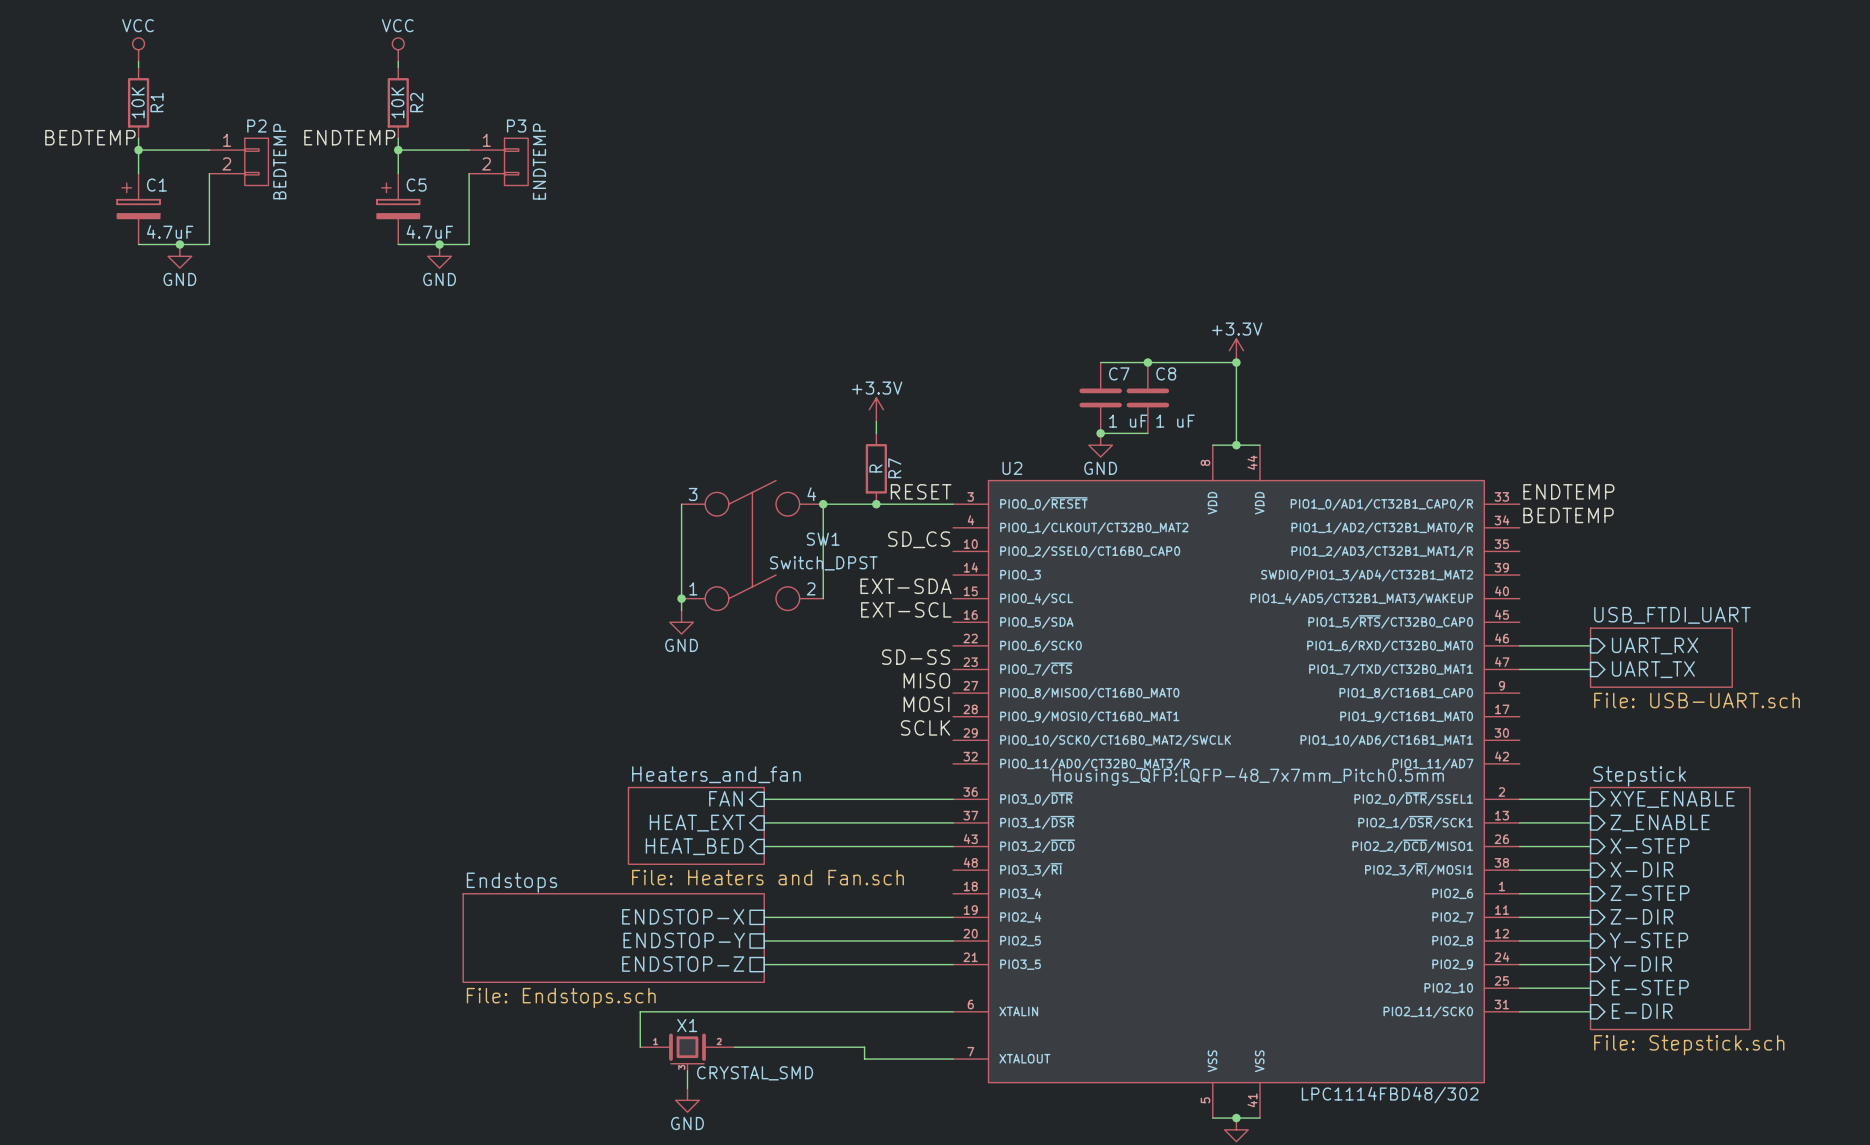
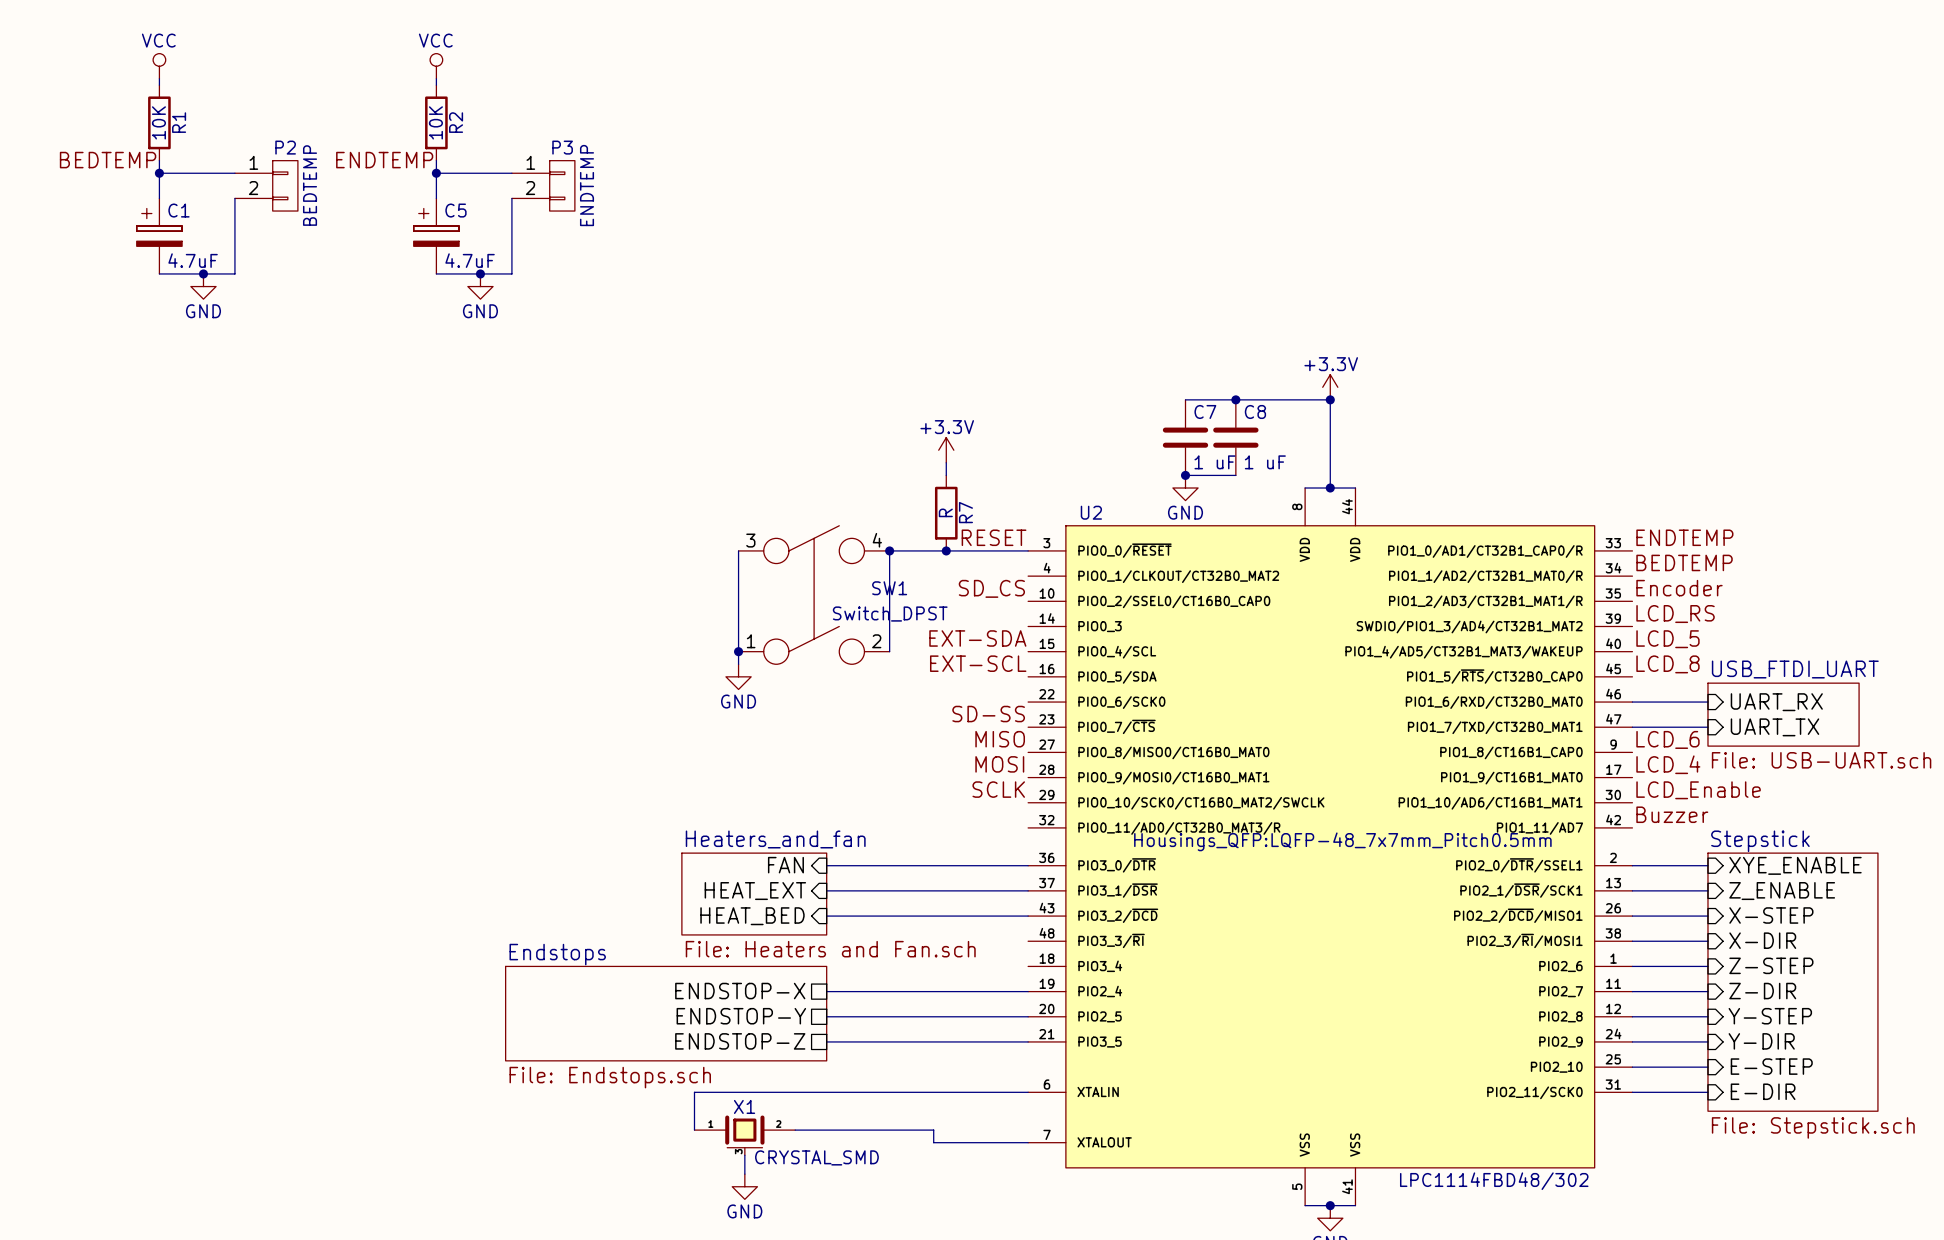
label: none -> Encoder (1679, 588)
label: none -> LCD_RS (1675, 614)
label: none -> LCD_5 (1667, 639)
label: none -> LCD_8 (1667, 664)
label: none -> LCD_6 (1667, 739)
label: none -> LCD_4 (1668, 764)
label: none -> LCD_Enable (1698, 790)
label: none -> Buzzer (1672, 814)

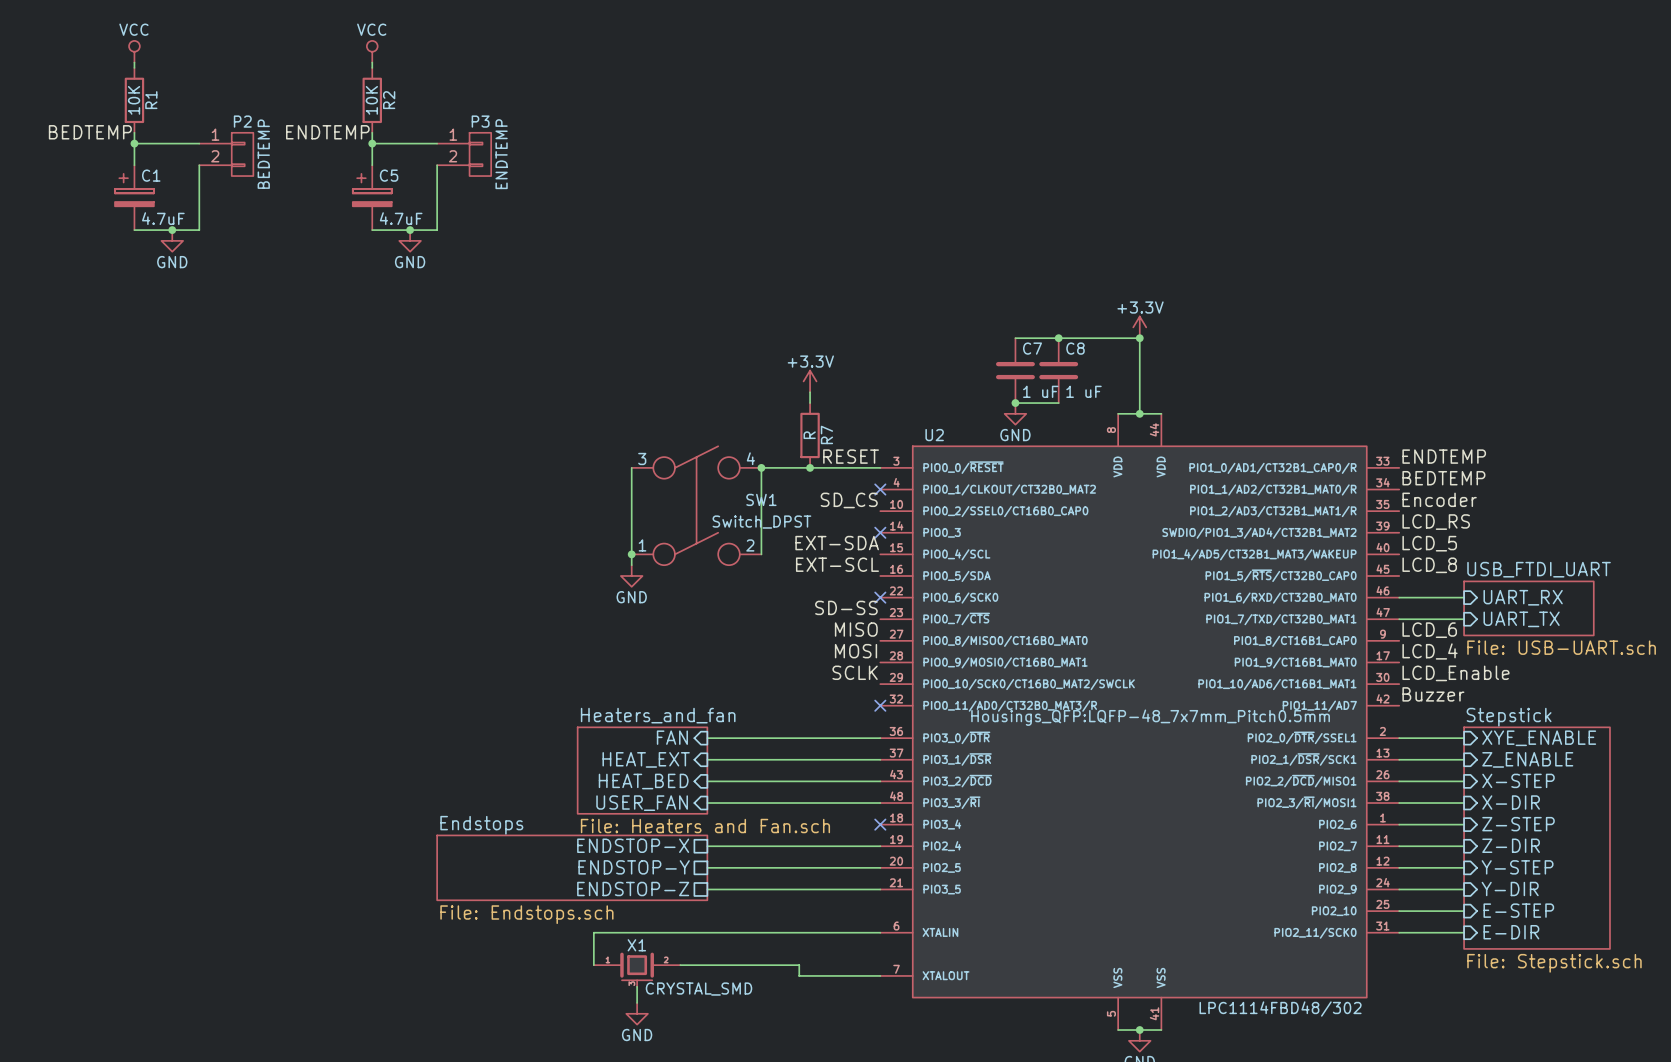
no-connect mark: none -> (880, 489)
no-connect mark: none -> (880, 532)
no-connect mark: none -> (880, 597)
no-connect mark: none -> (880, 705)
sheet Heaters_and_fan: File: Heaters and Fan.sch (754, 894) -> none
sheet Heaters_and_fan: none -> File: Heaters and Fan.sch (642, 770)
sheet pin: none -> USER_FAN (642, 803)
wire: none -> (707, 803) (880, 803)
sheet Endstops shape: [505, 966, 827, 1061] -> [437, 835, 708, 901]
no-connect mark: none -> (880, 824)

